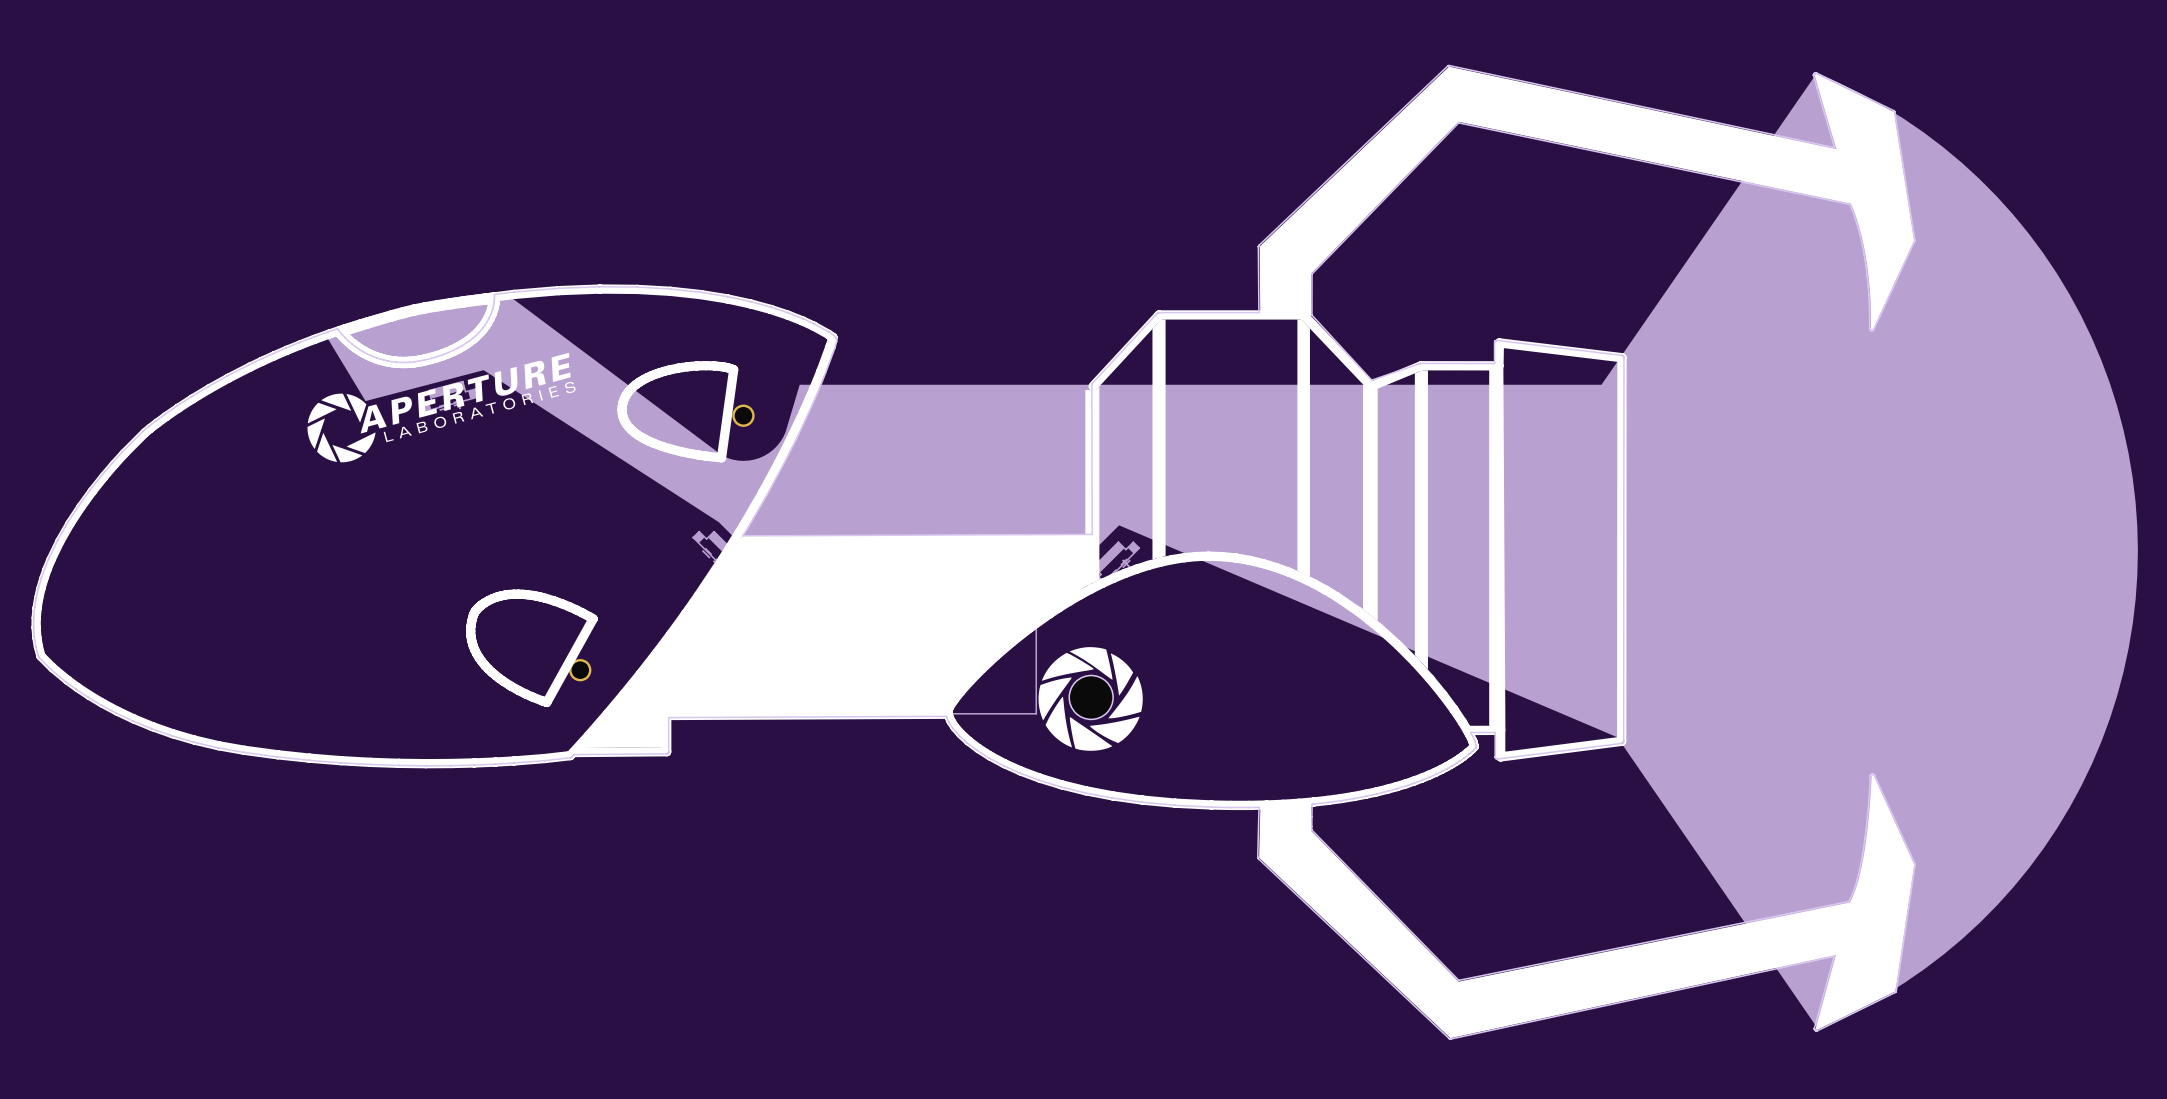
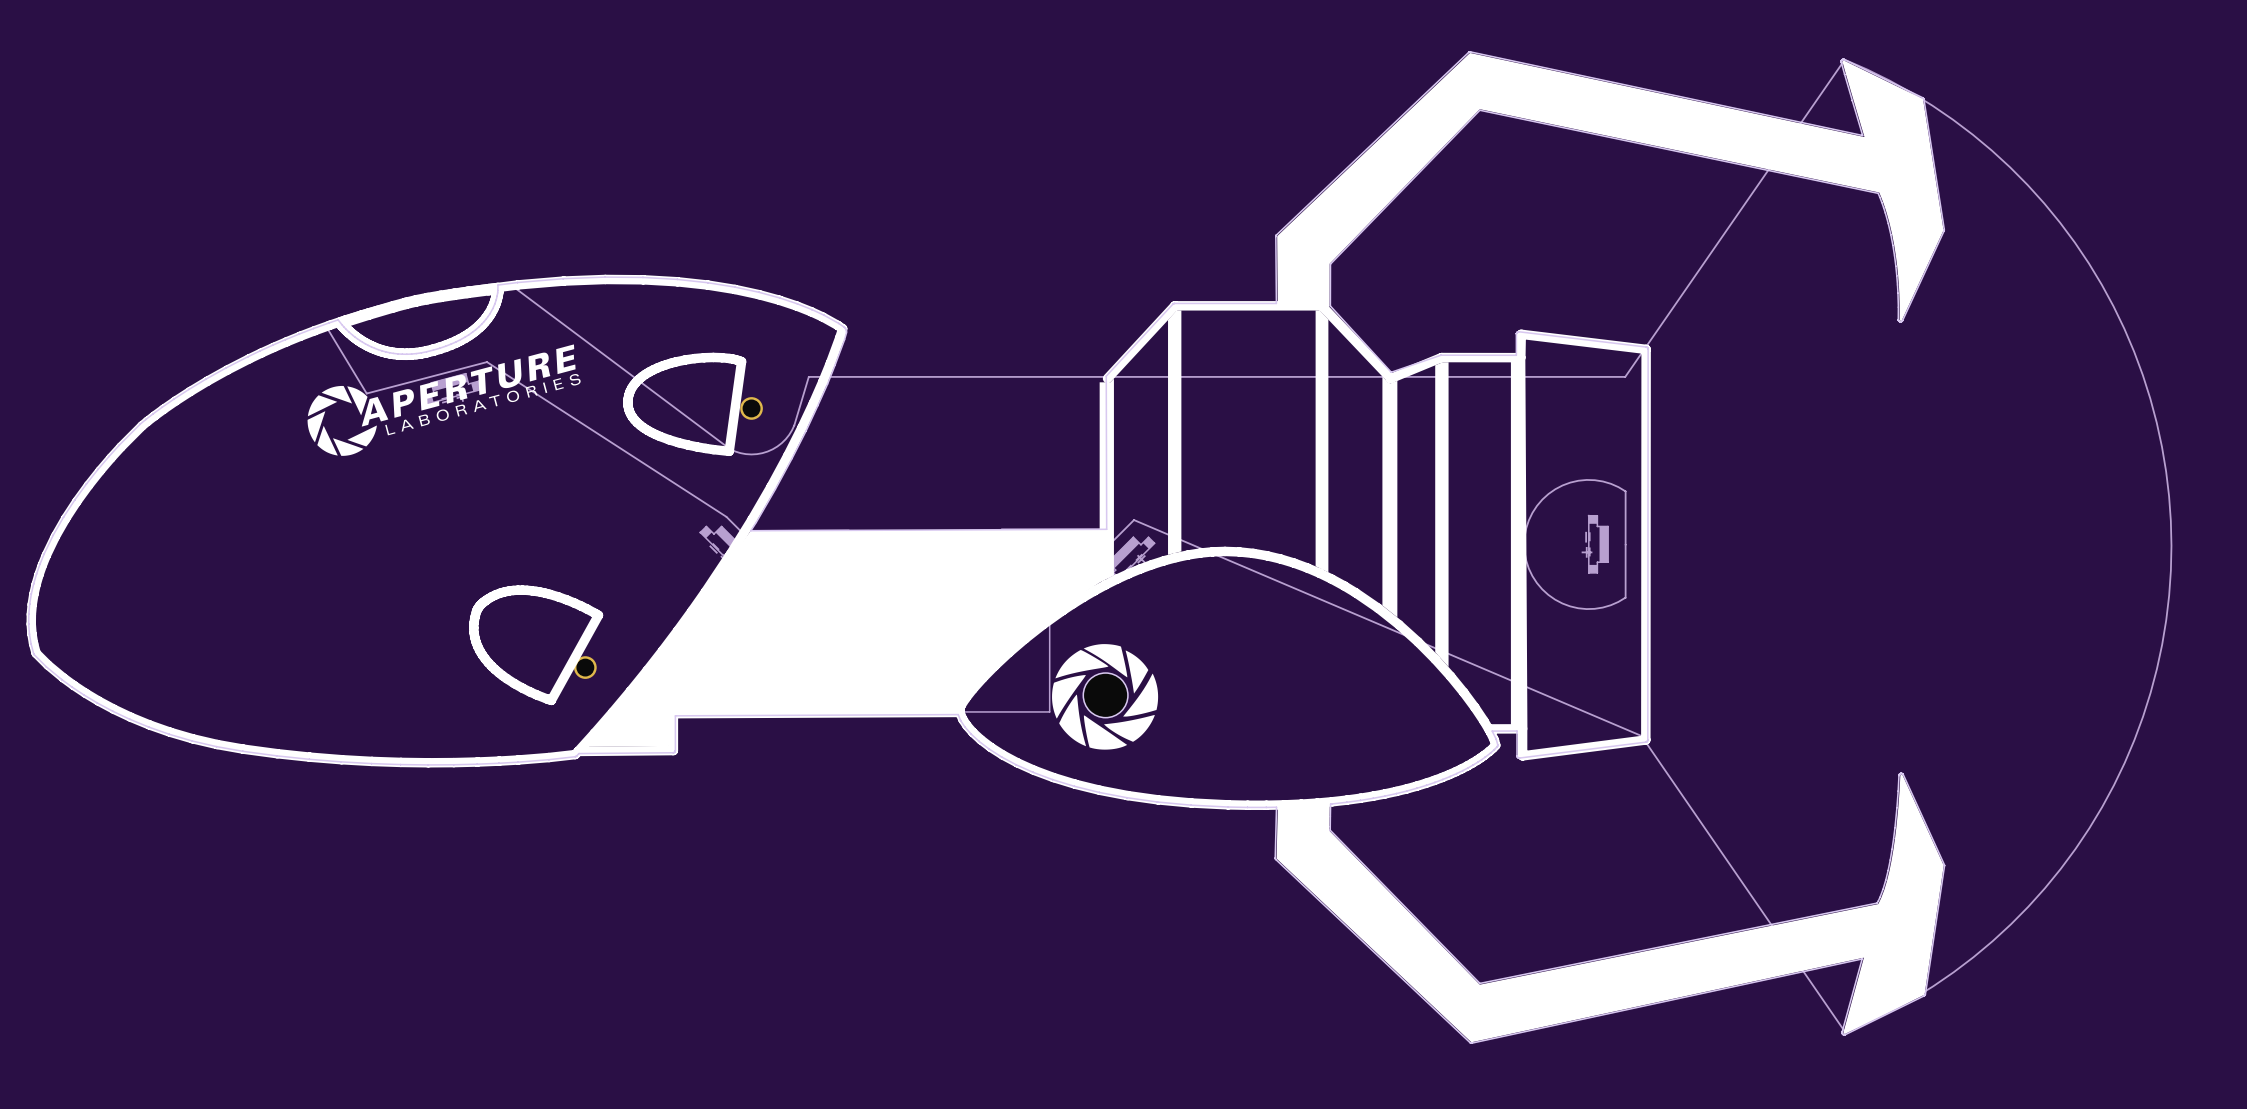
drawing: [324, 73, 2138, 1029] -> none
line: none -> (1844, 59) (1911, 92) (1972, 134) (2027, 185) (2074, 242) (2113, 306) (2142, 374) (2156, 422) (2166, 471) (2171, 545) (2169, 595) (2162, 644) (2143, 716) (2114, 785) (2075, 849) (2028, 906) (1973, 957) (1912, 999) (1845, 1032) (1641, 735) (1134, 520) (1095, 558) (1072, 546) (756, 546) (726, 516) (486, 362) (366, 393) (324, 324) (416, 297) (509, 283) (730, 449) (751, 454) (772, 449) (789, 435) (794, 425) (808, 376) (1625, 376) (1844, 60)
line: none -> (1625, 597) (1610, 605) (1594, 608) (1570, 606) (1548, 594) (1532, 576) (1524, 552) (1526, 528) (1537, 505) (1555, 489) (1578, 480) (1594, 480) (1610, 483) (1625, 491) (1625, 597)

